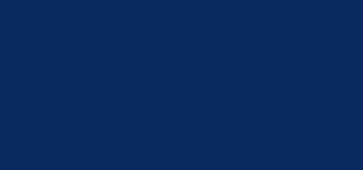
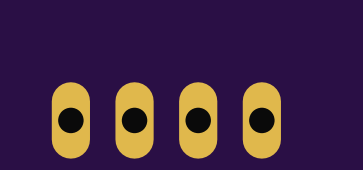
part: none -> (166, 120)

